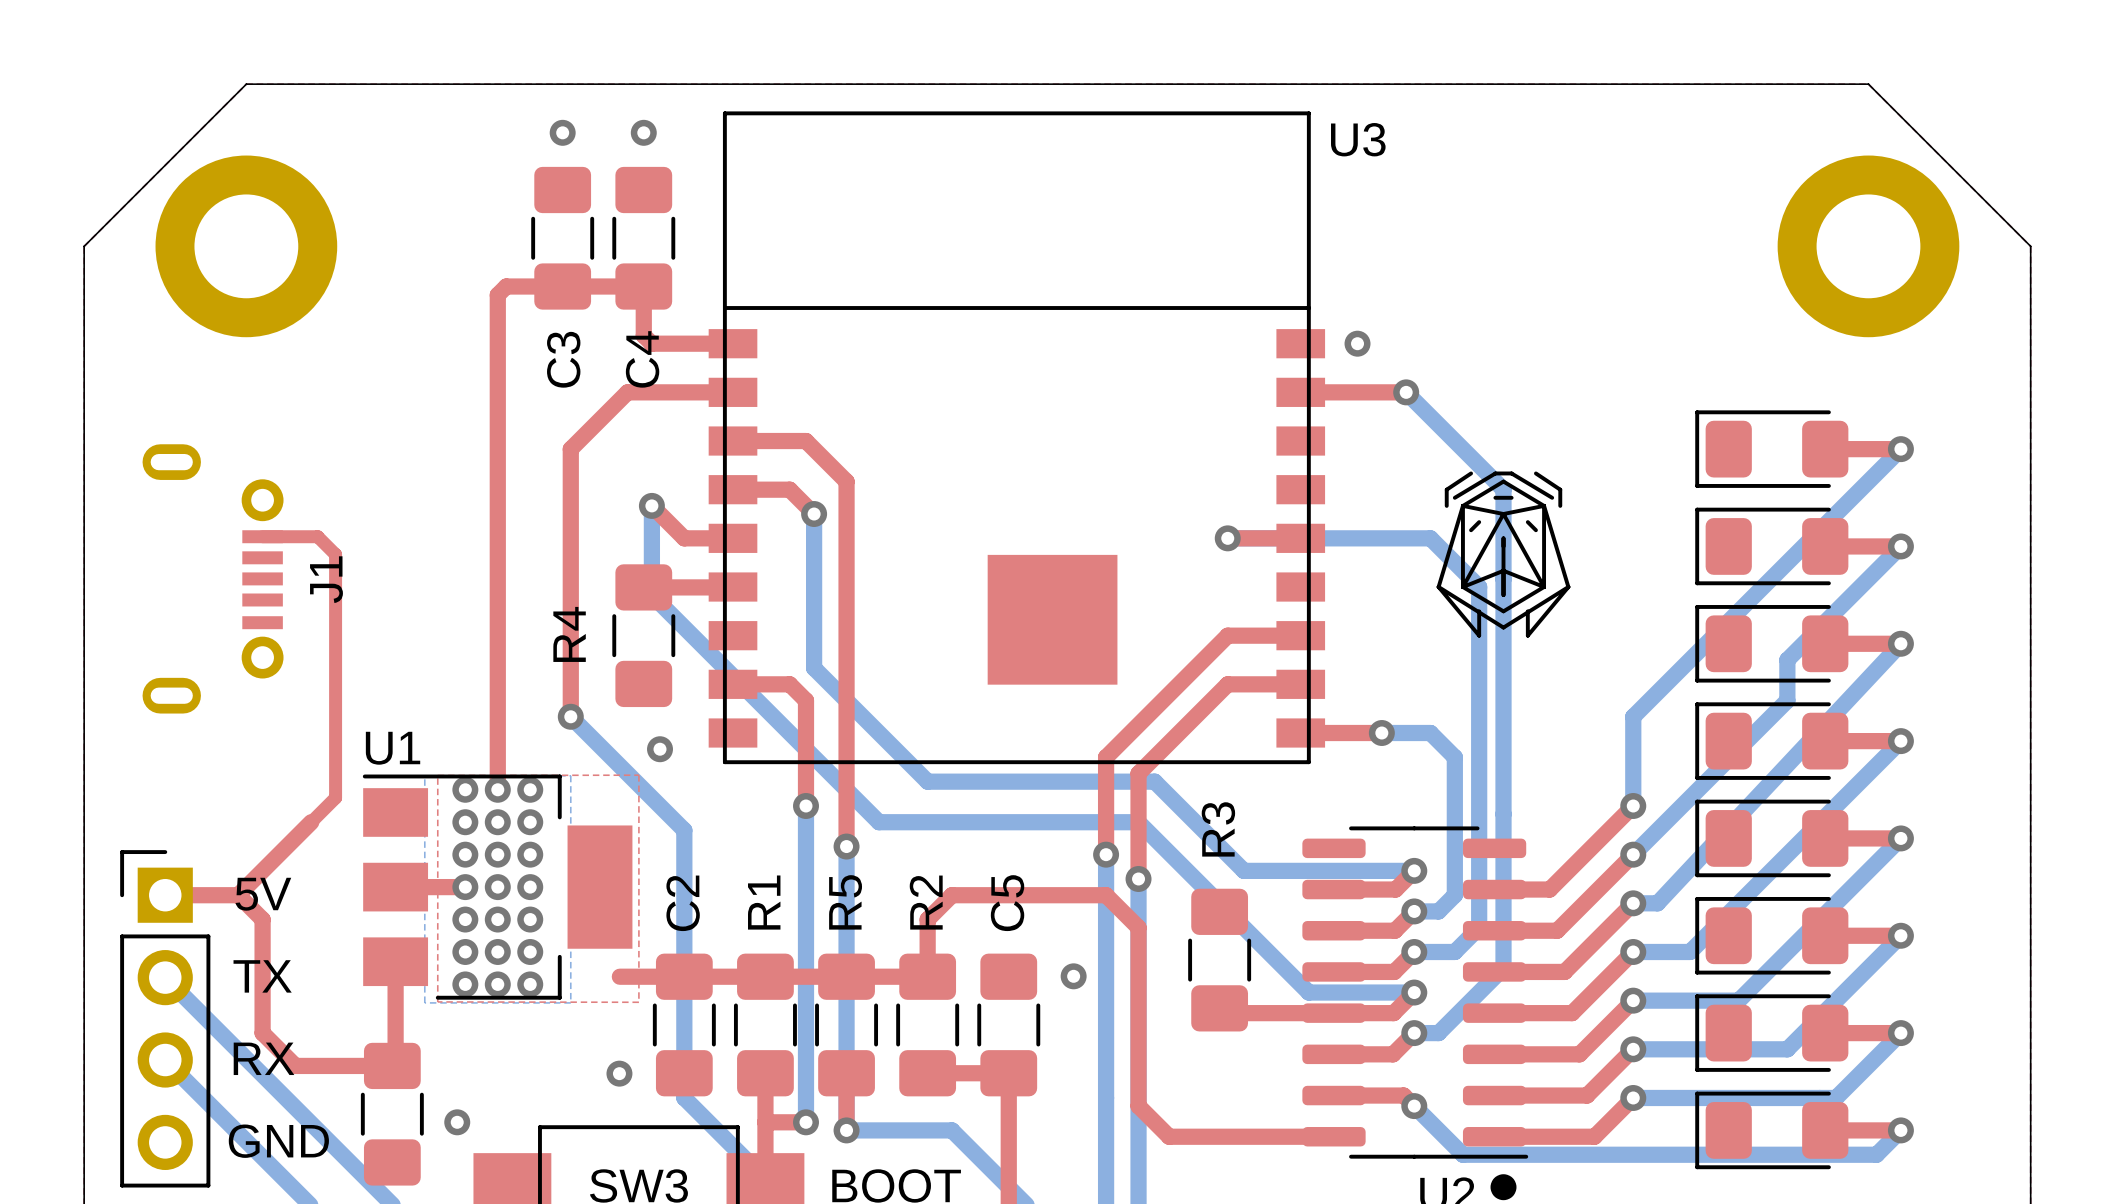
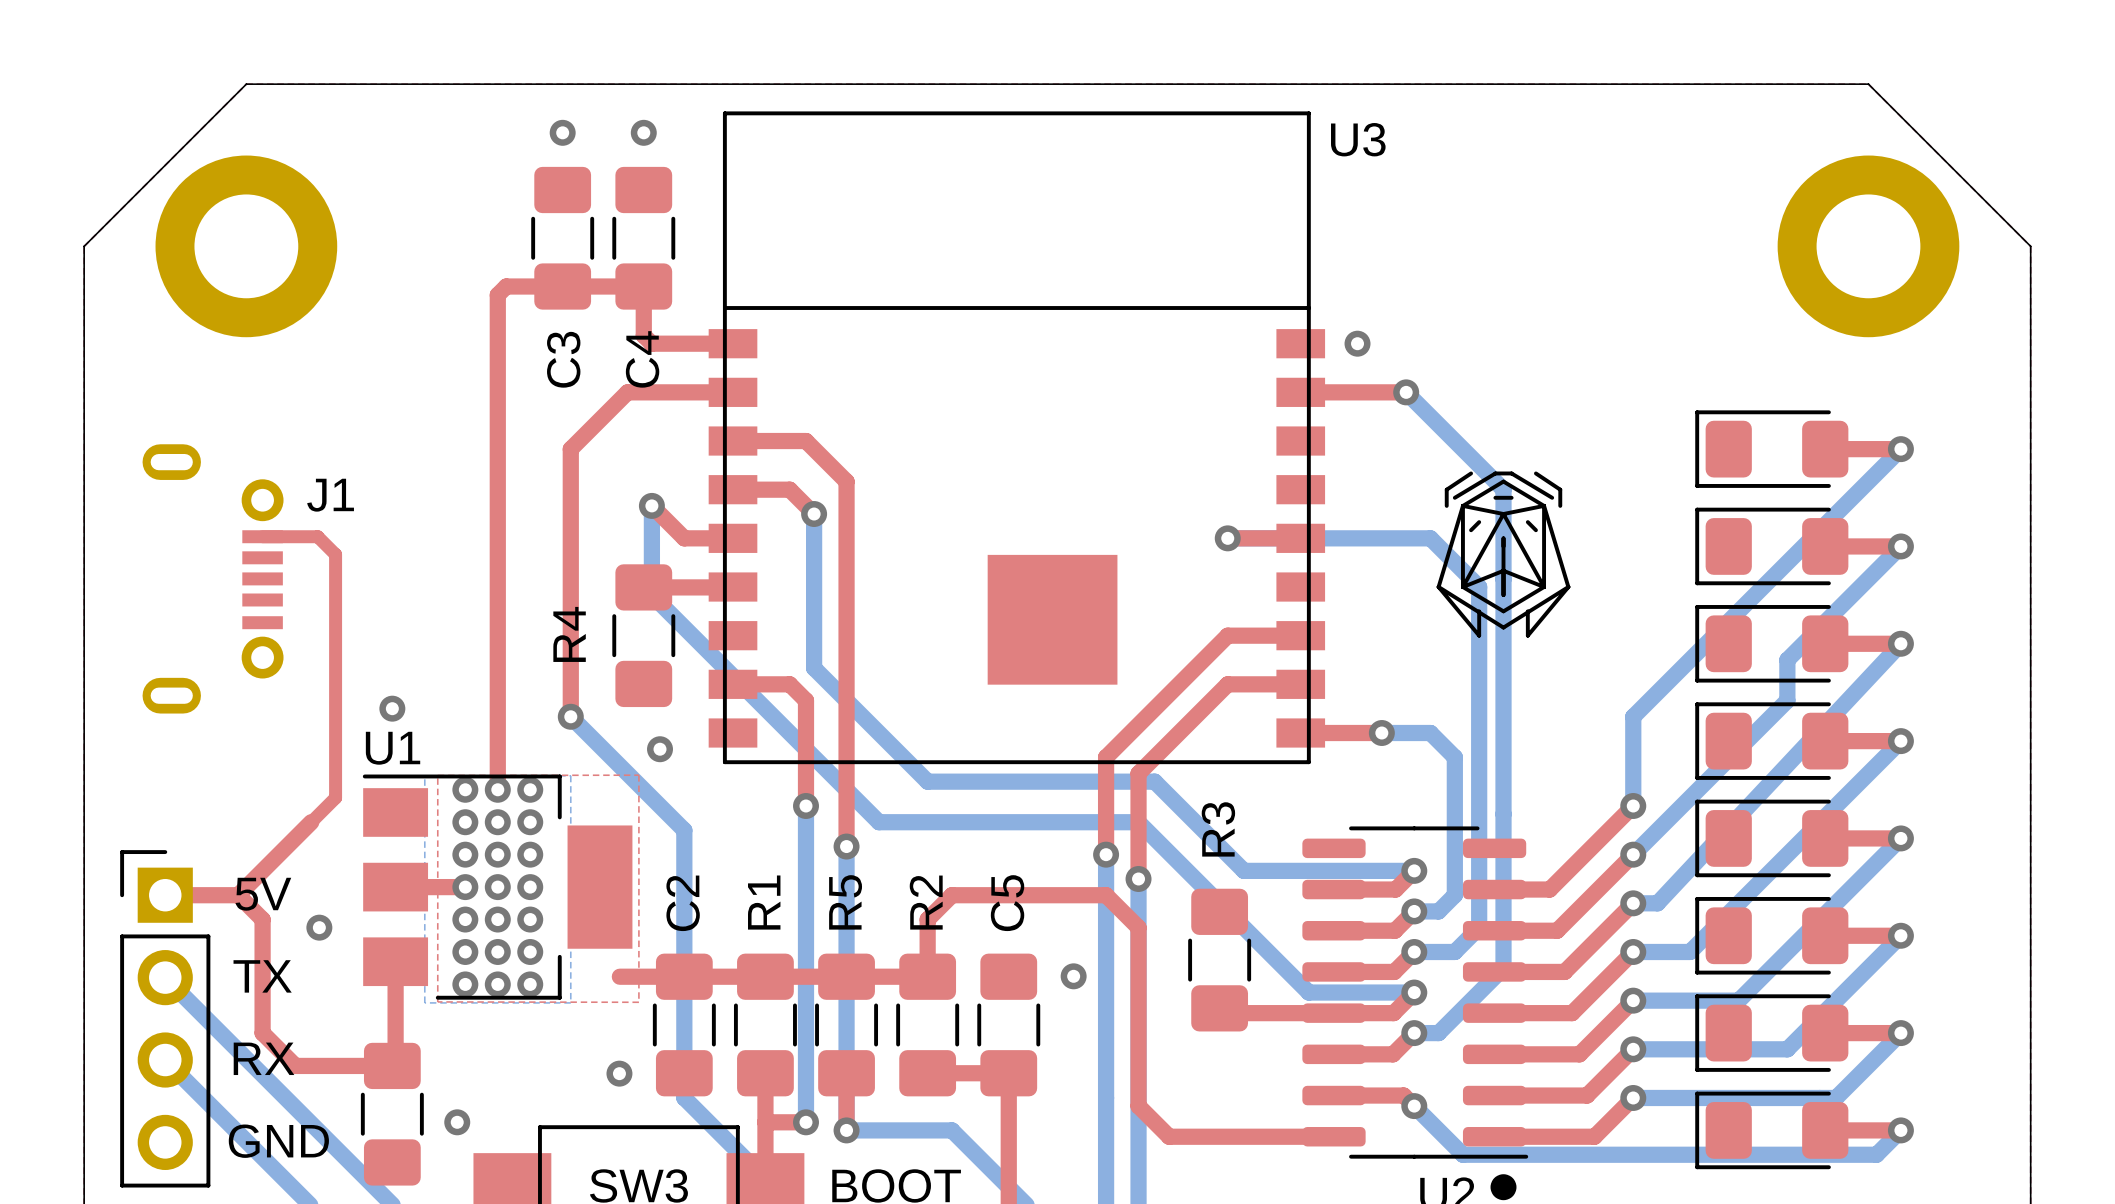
J1 name rotation: 0° (326, 579) -> 90° clockwise (330, 495)
J1 name position: J1 (326, 579) -> J1 (330, 495)
via: none -> (392, 708)
via: none -> (319, 927)

